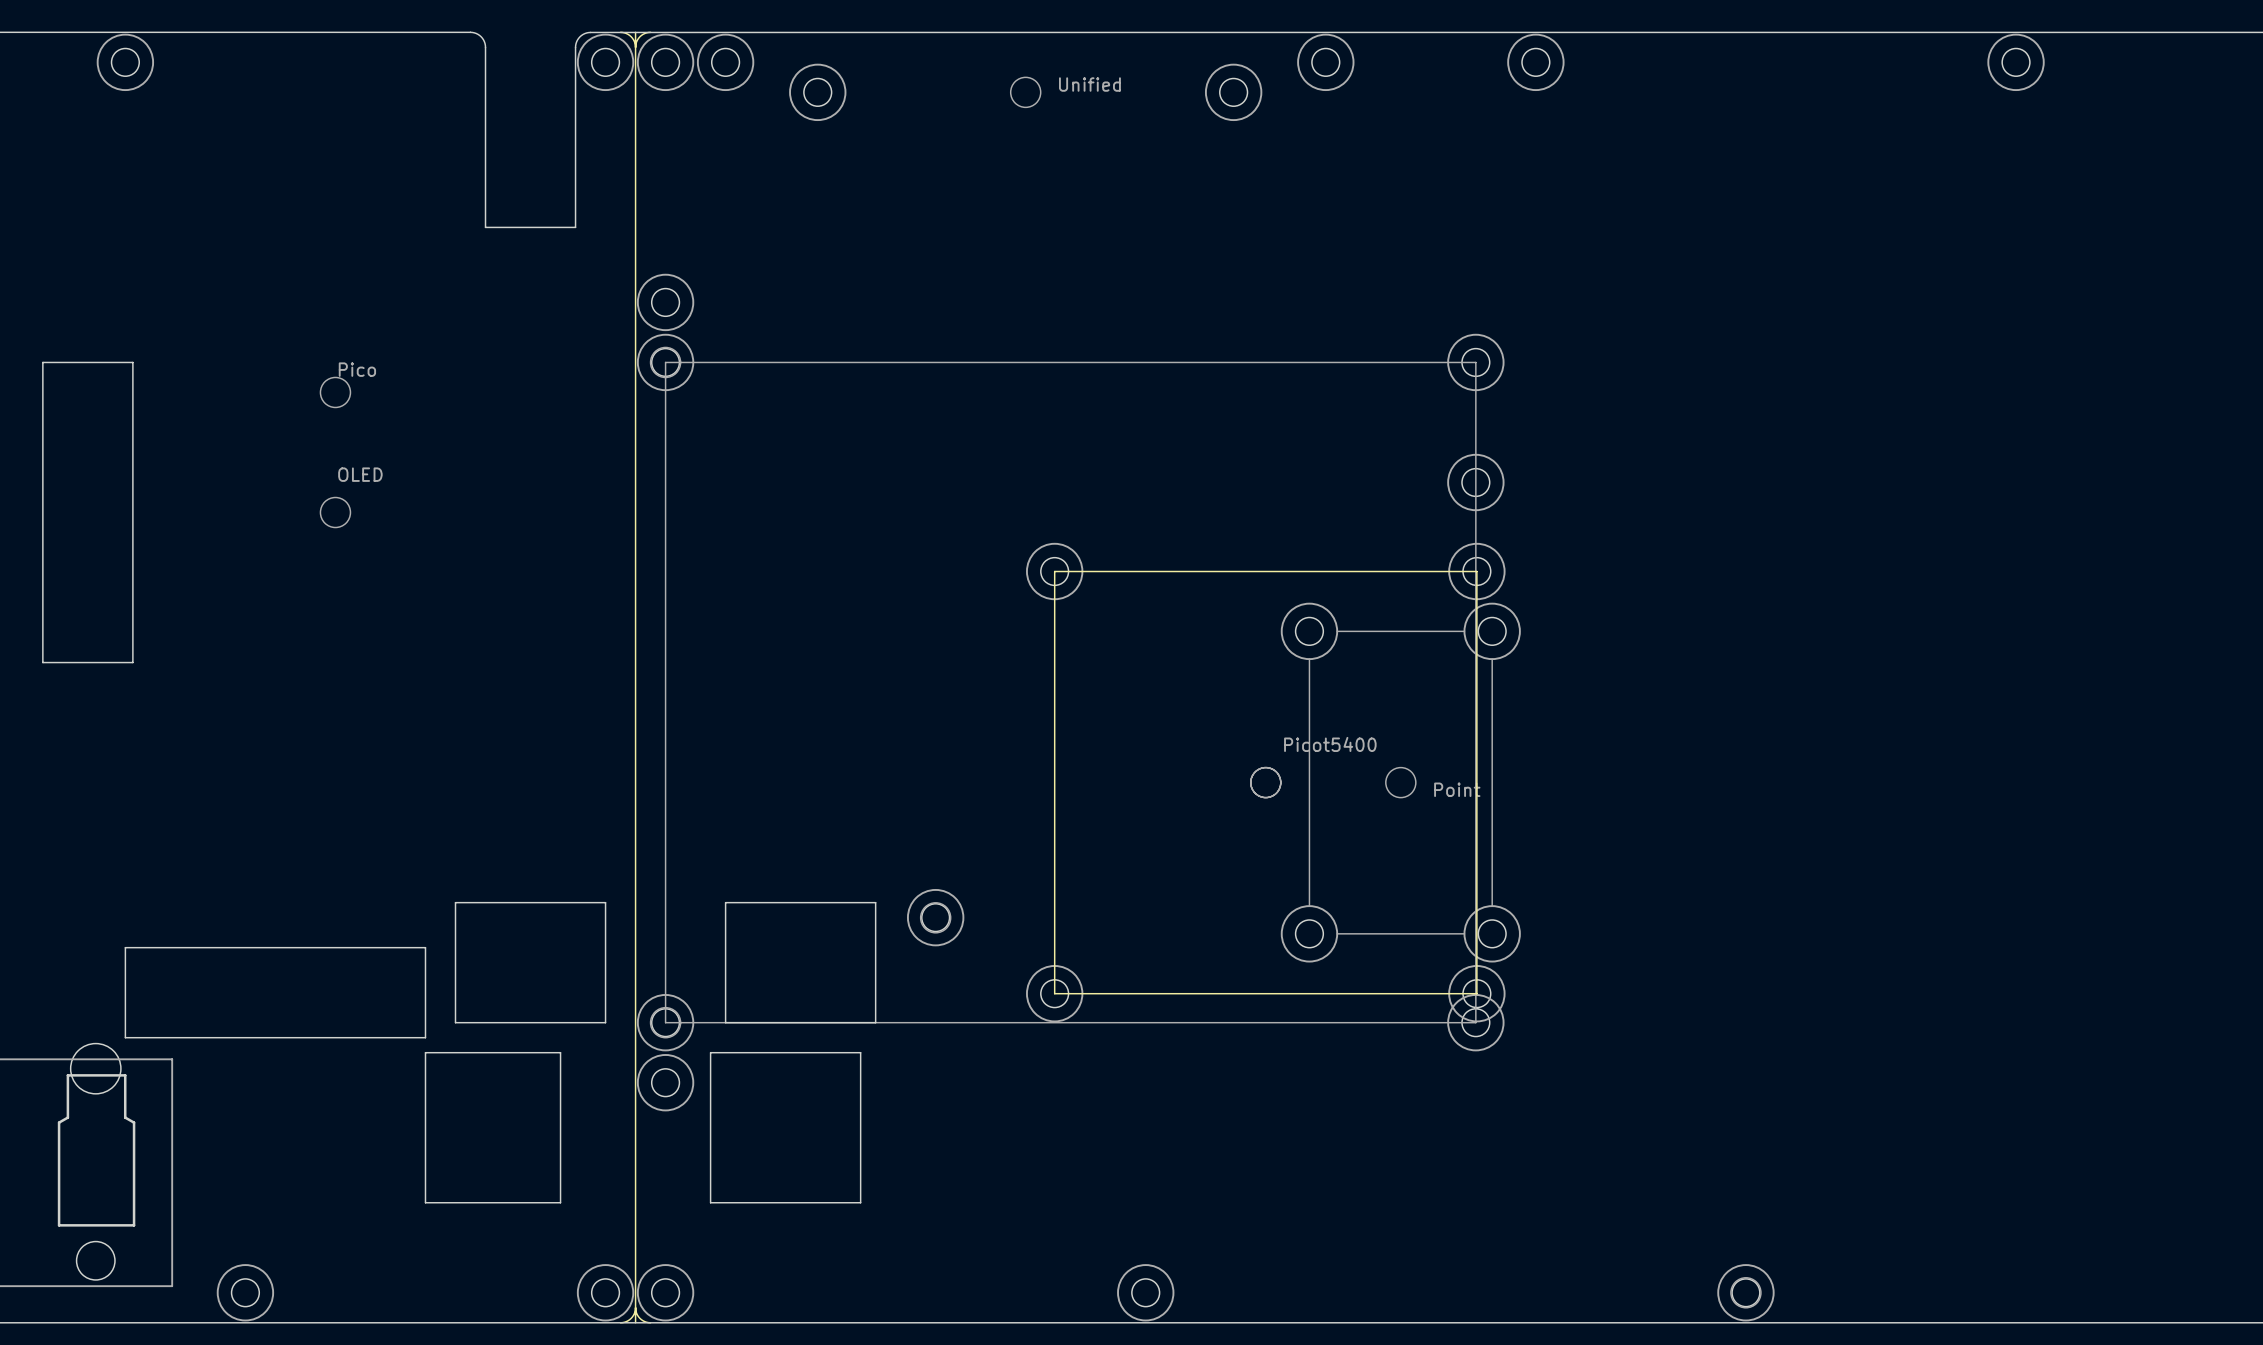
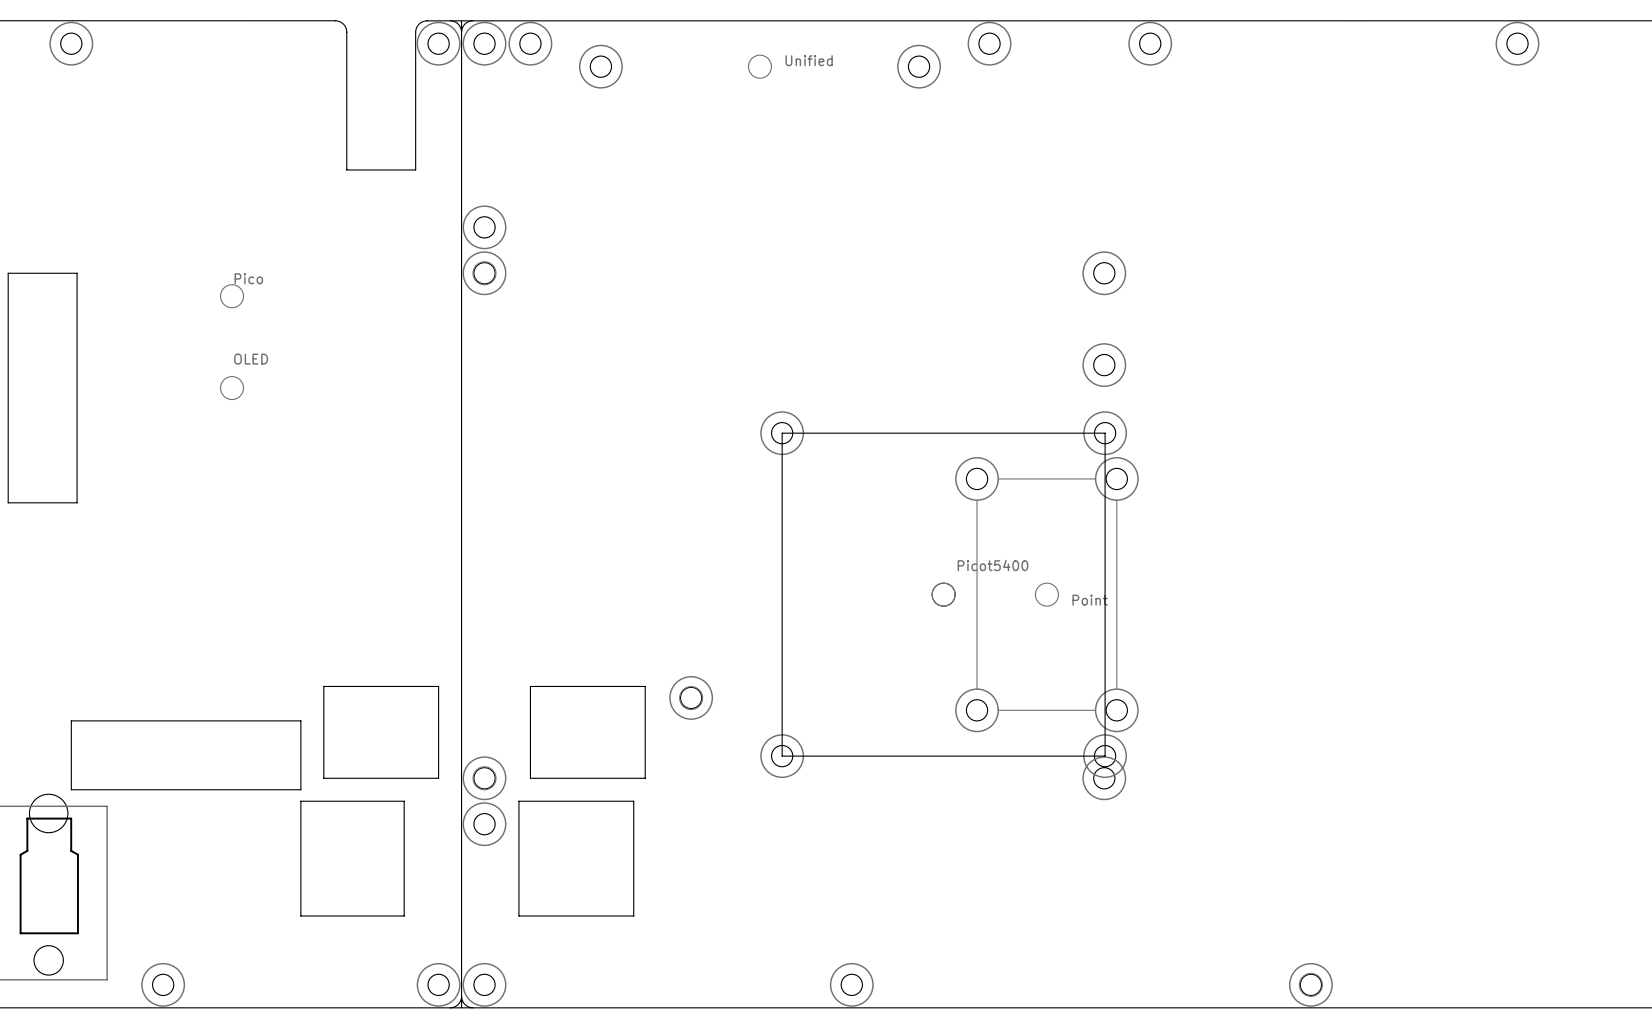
line: (665, 362) (1475, 362) (1475, 1022) (665, 1022) (665, 362) -> none

